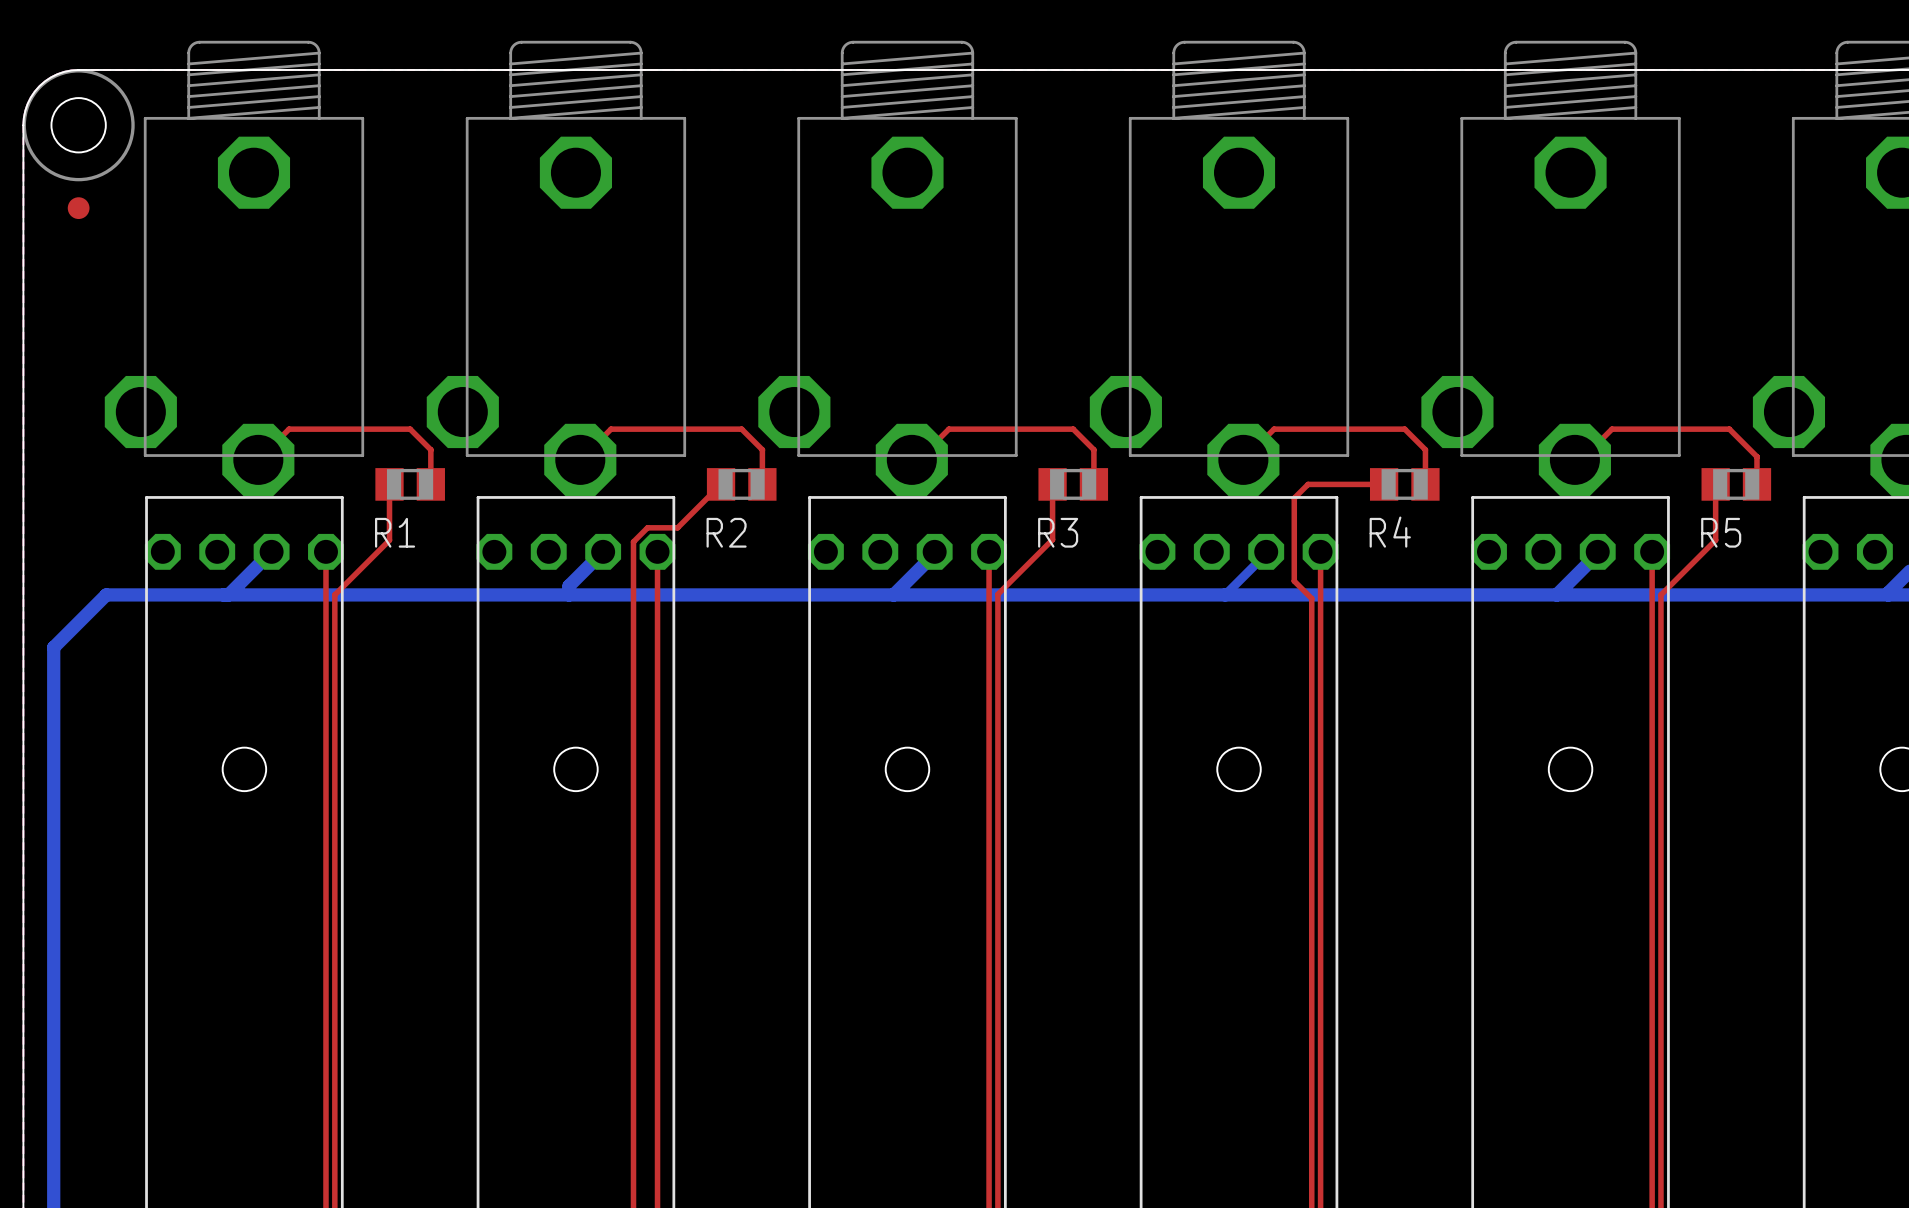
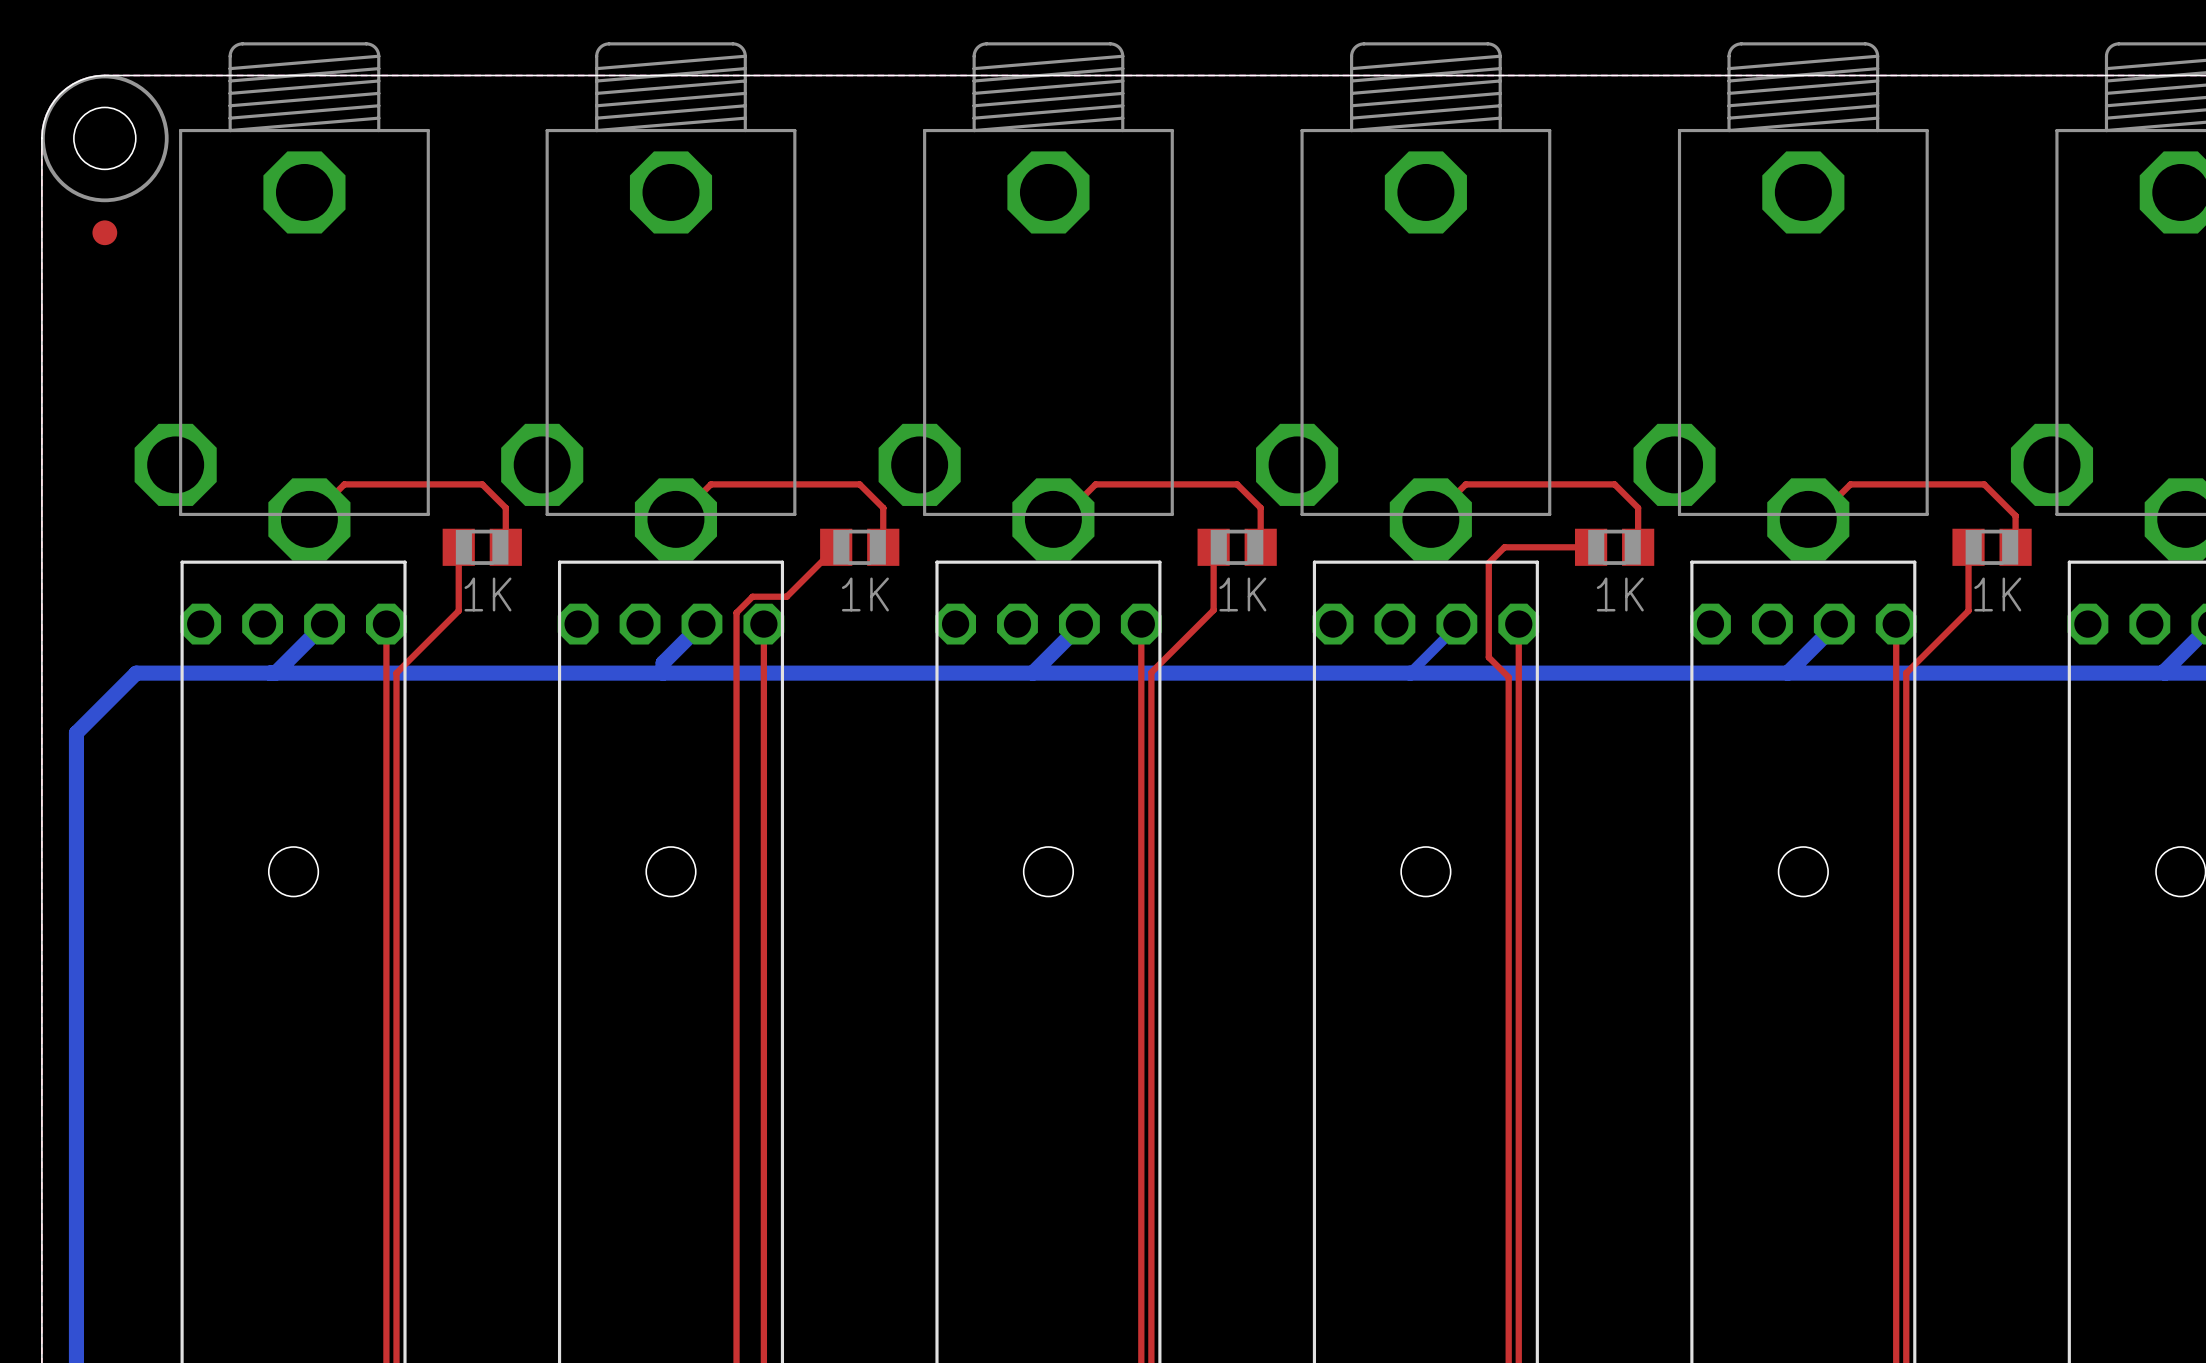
R1 value: none -> 1K (487, 594)
R2 value: none -> 1K (865, 594)
R3 value: none -> 1K (1242, 594)
R4 value: none -> 1K (1620, 594)
R5 value: none -> 1K (1997, 594)
R1 name: R1 (395, 532) -> none
R2 name: R2 (726, 532) -> none
R3 name: R3 (1058, 532) -> none
R4 name: R4 (1390, 532) -> none
R5 name: R5 (1721, 532) -> none

